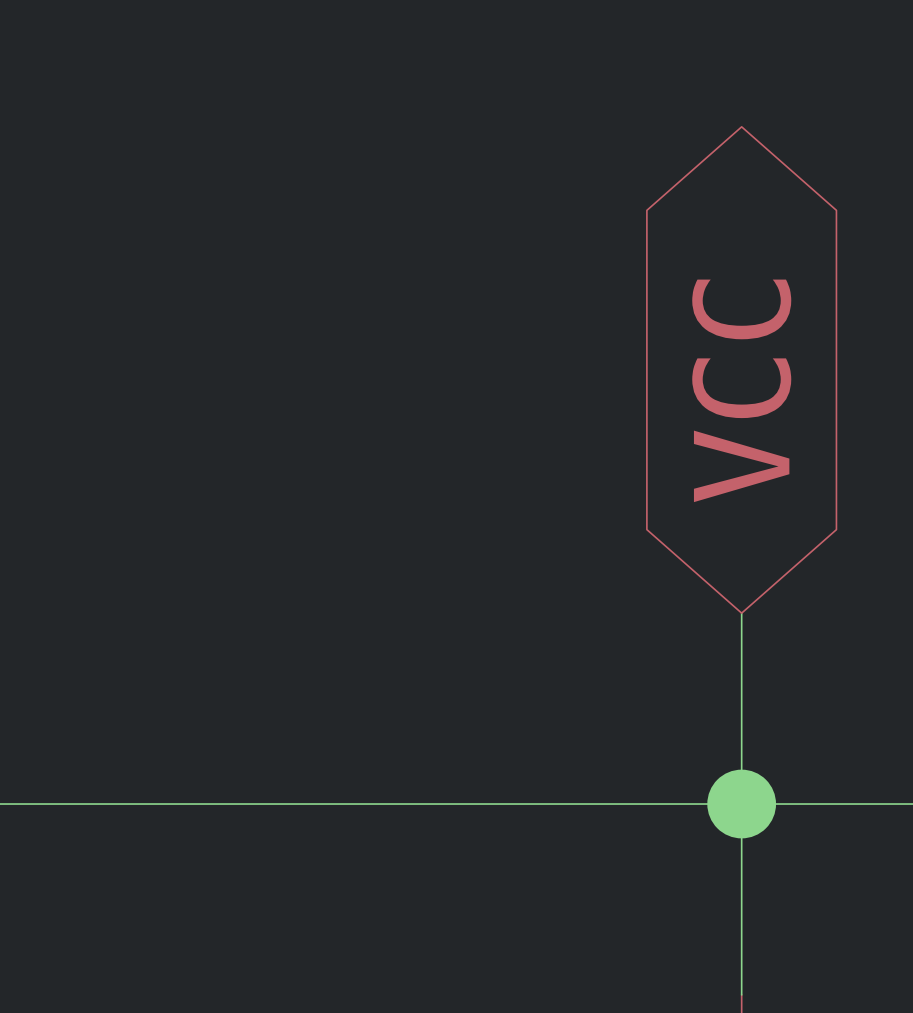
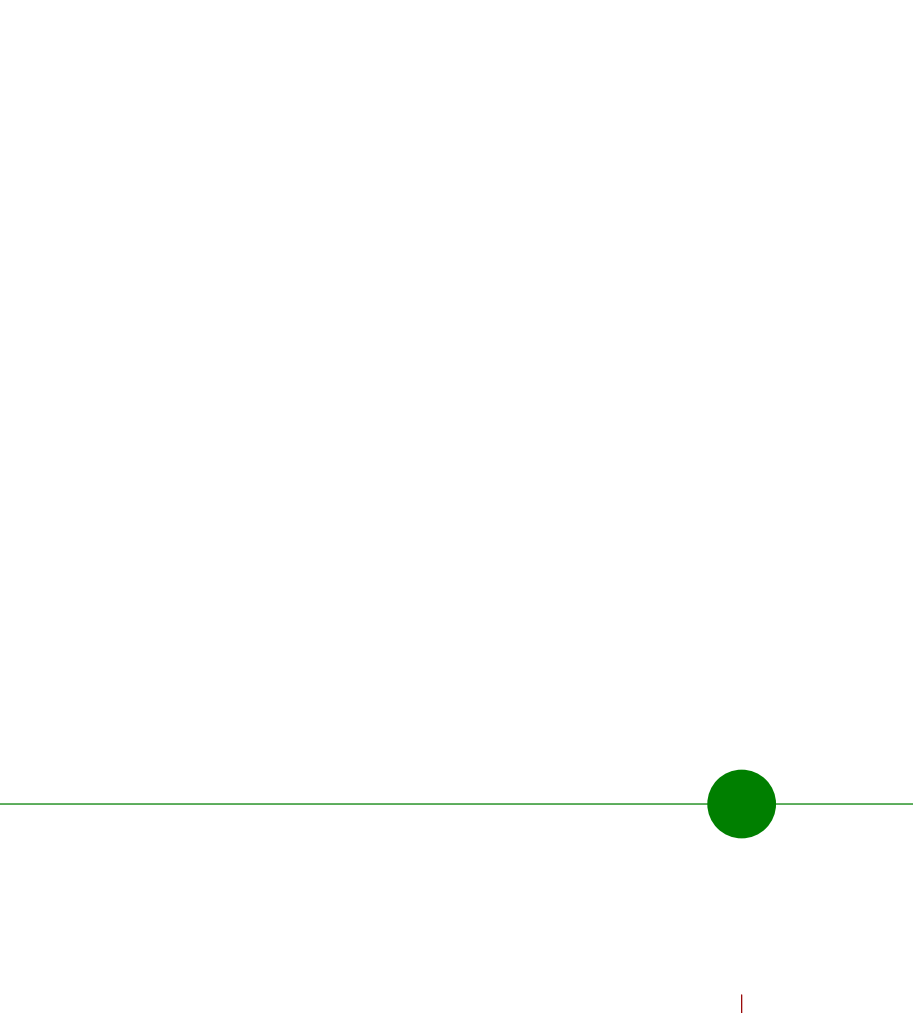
global label: VCC (741, 390) -> none
wire: (741, 613) (741, 994) -> none

